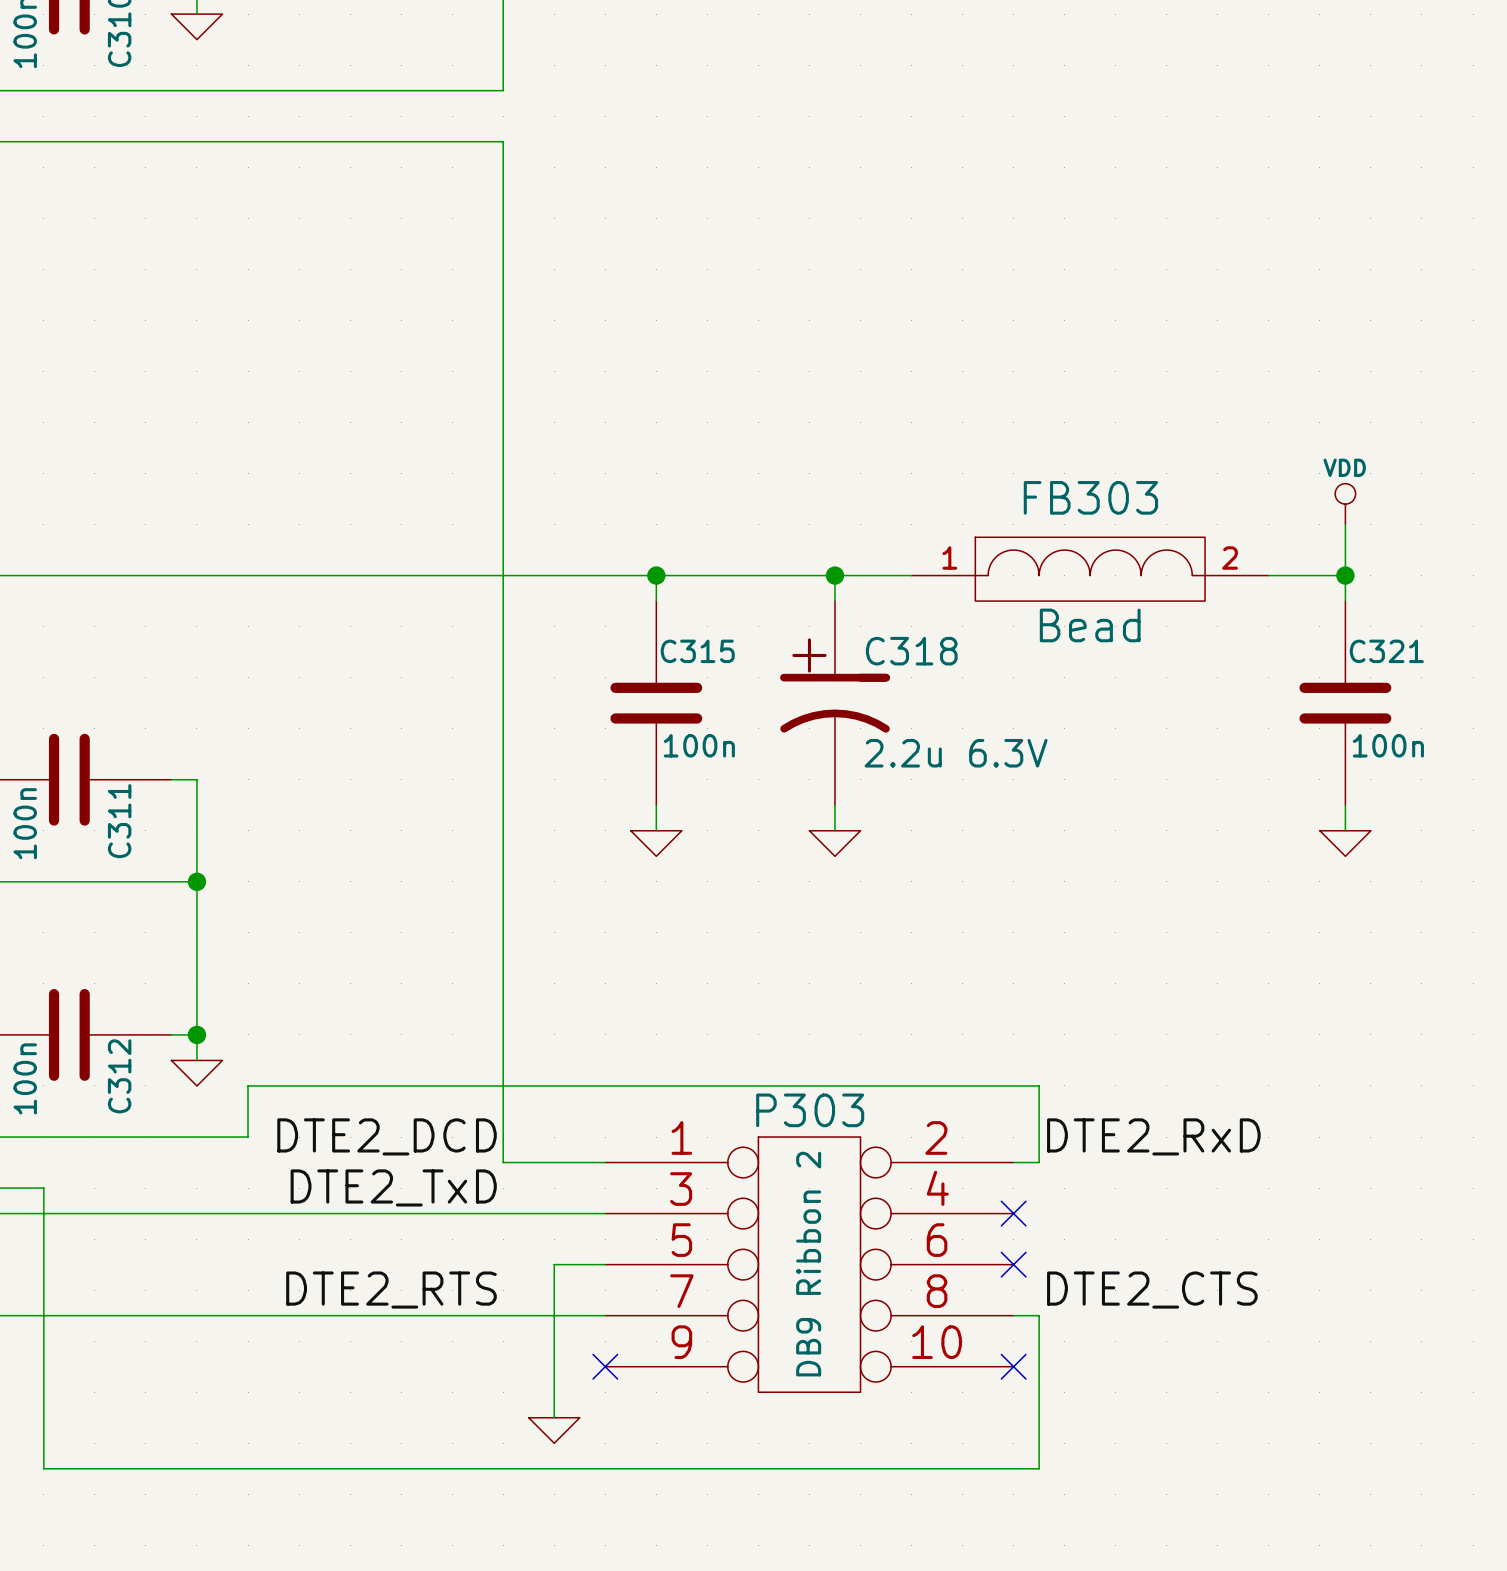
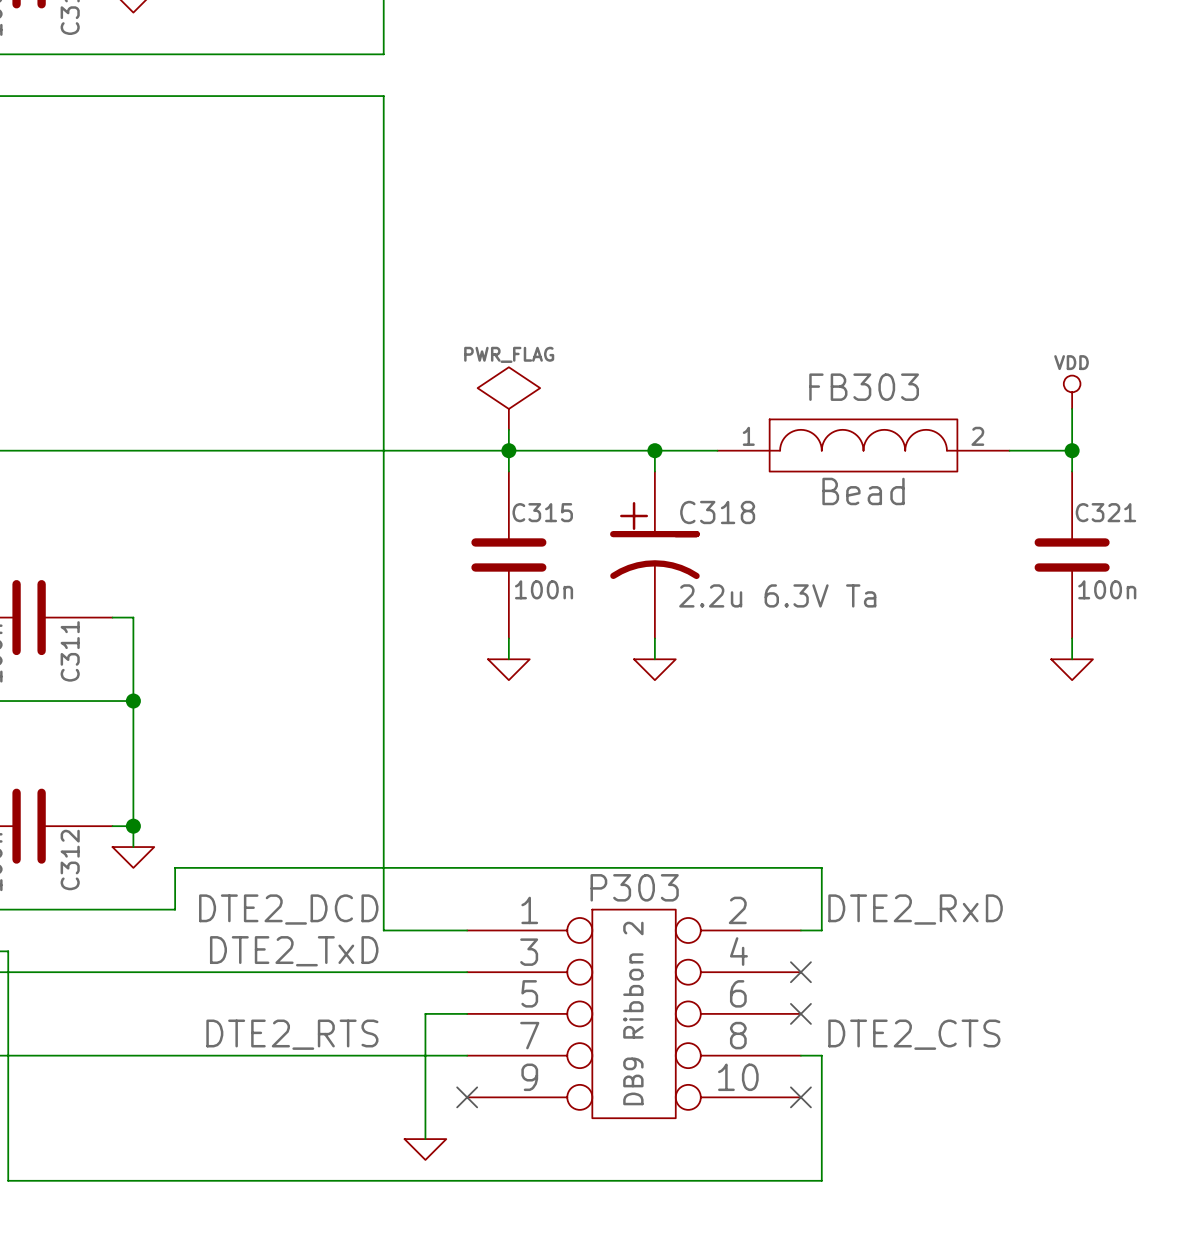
power symbol: none -> PWR_FLAG (508, 398)
wire: none -> (508, 429) (508, 450)
C318 value: 2.2u 6.3V (956, 753) -> 2.2u 6.3V Ta (777, 595)

